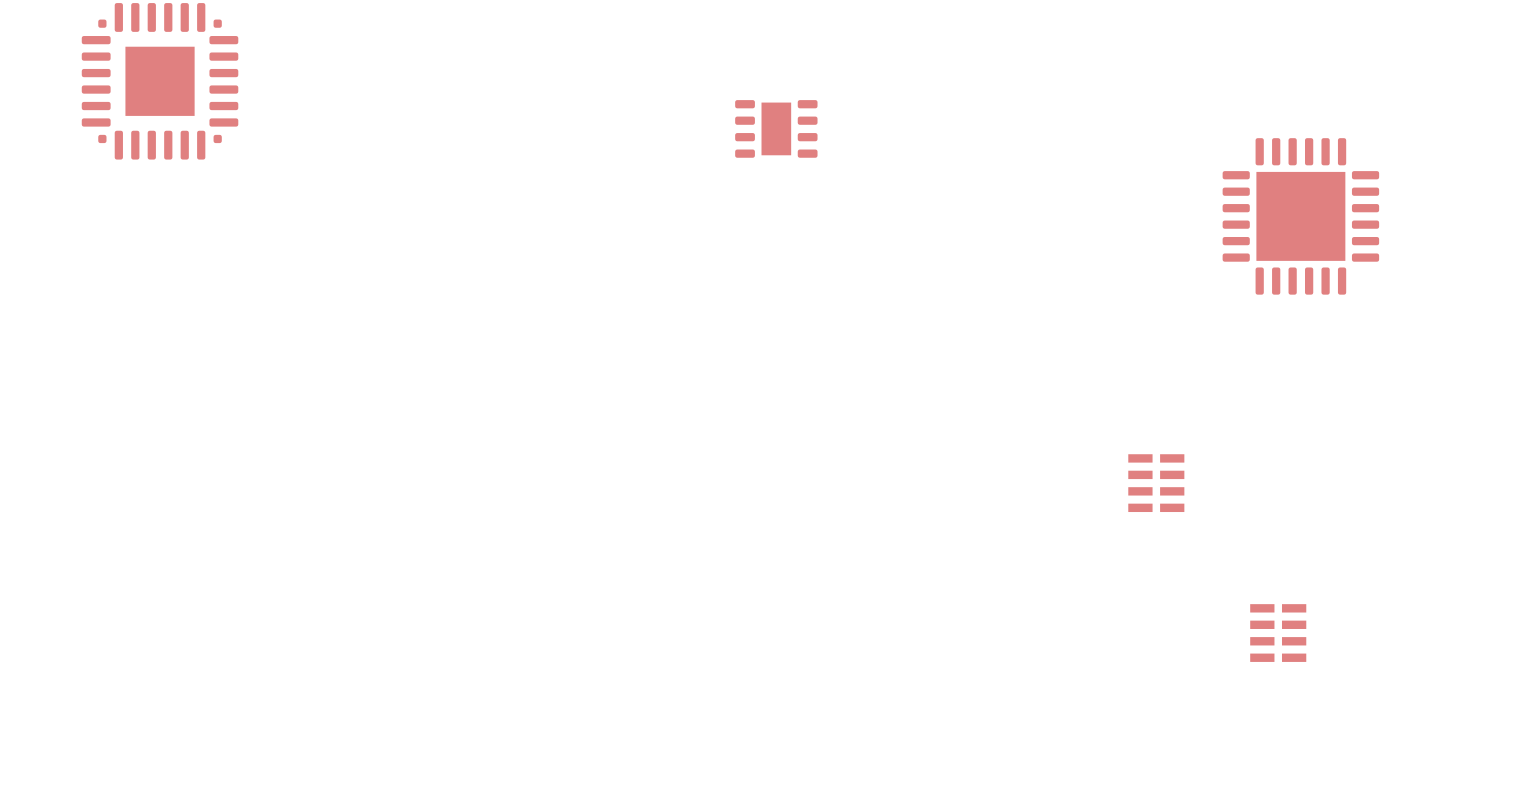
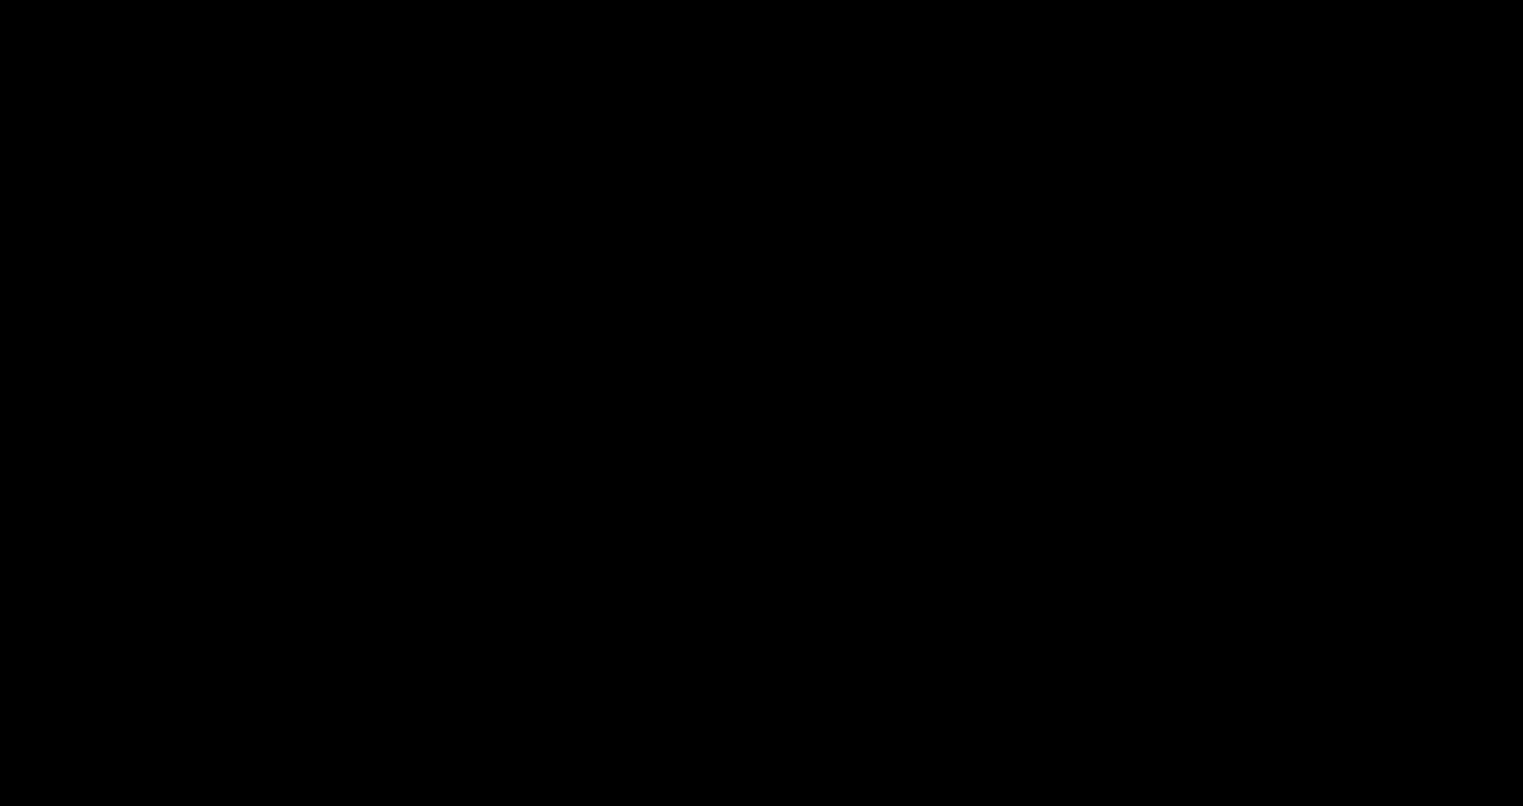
part: (160, 81) -> none
part: (776, 128) -> none
part: (1300, 216) -> none
part: (1156, 483) -> none
part: (1278, 633) -> none

